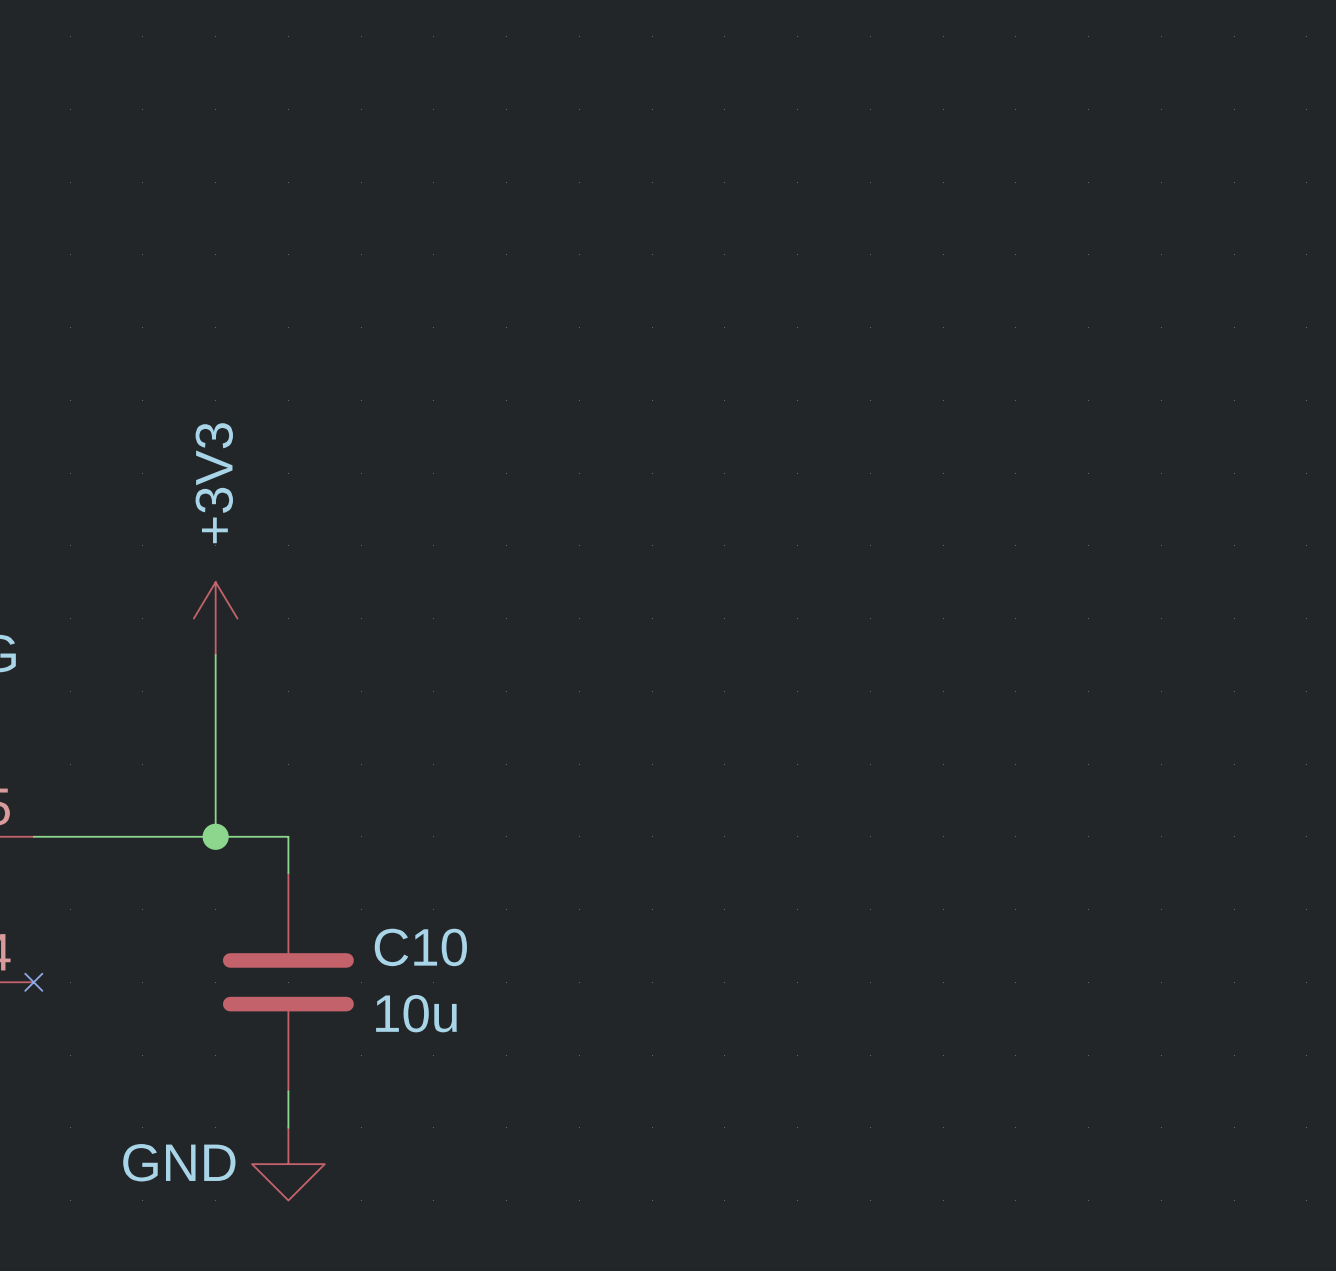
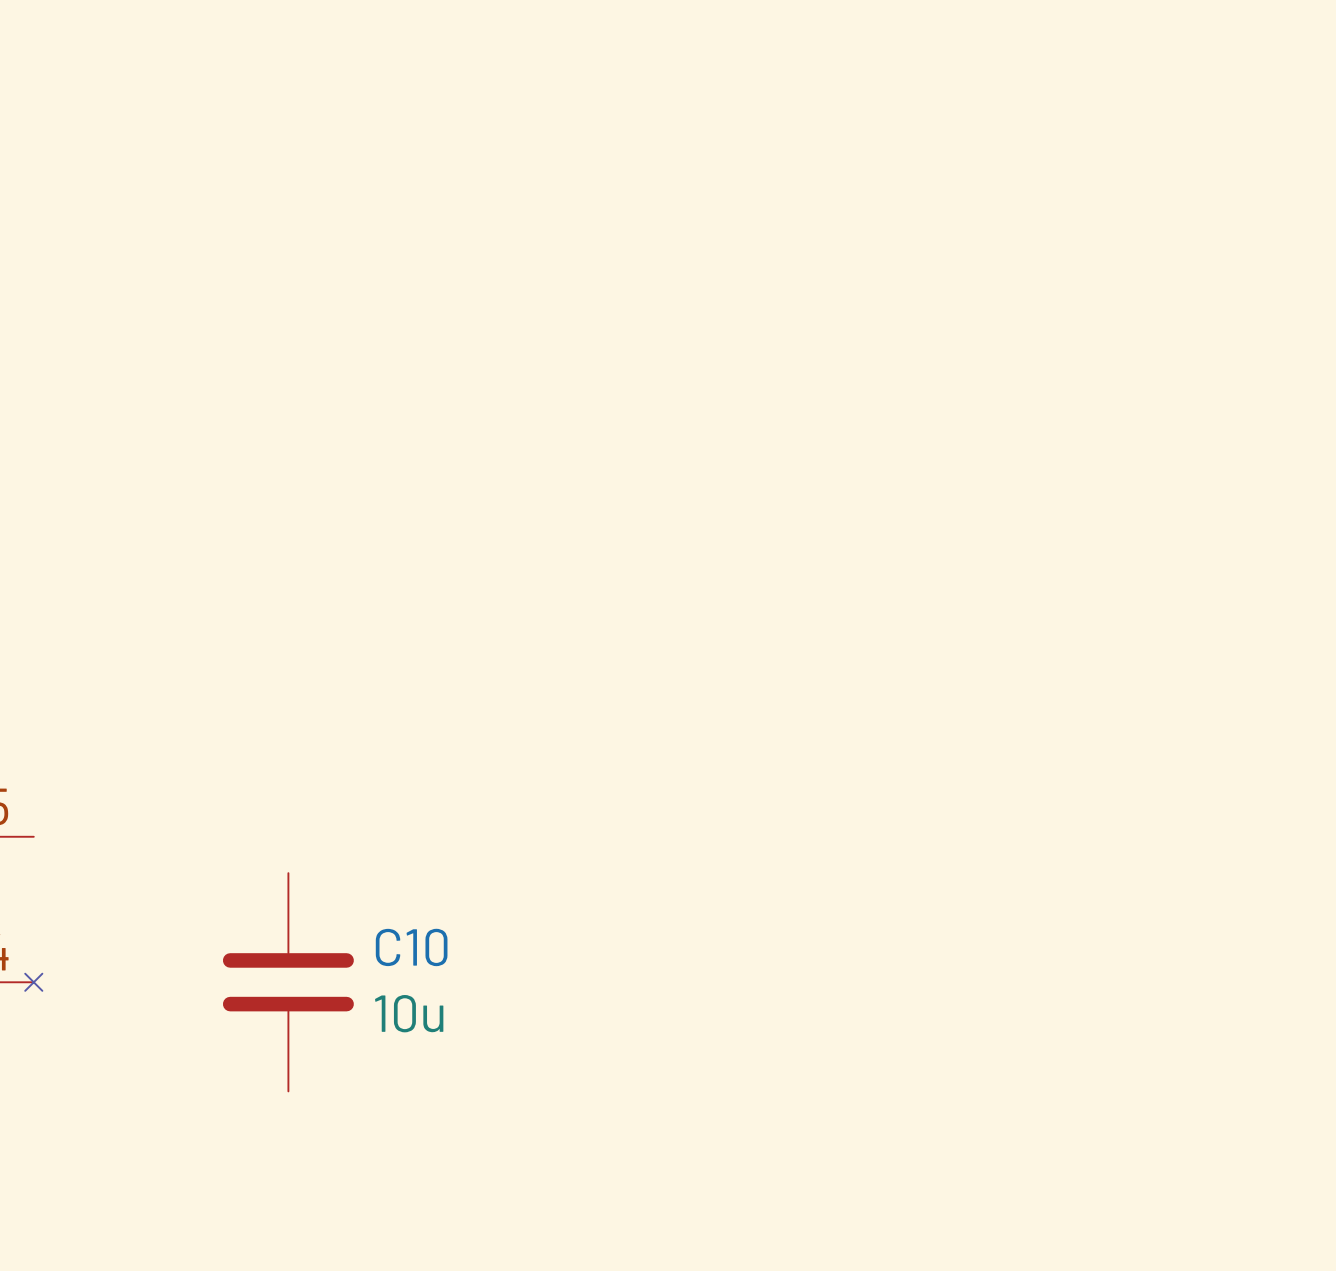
power symbol: +3V3 (215, 618) -> none
wire: (215, 654) (215, 836) -> none
wire: (33, 836) (288, 836) (288, 873) -> none
junction: (215, 836) -> none
wire: (288, 1091) (288, 1127) -> none
power symbol: GND (288, 1164) -> none

